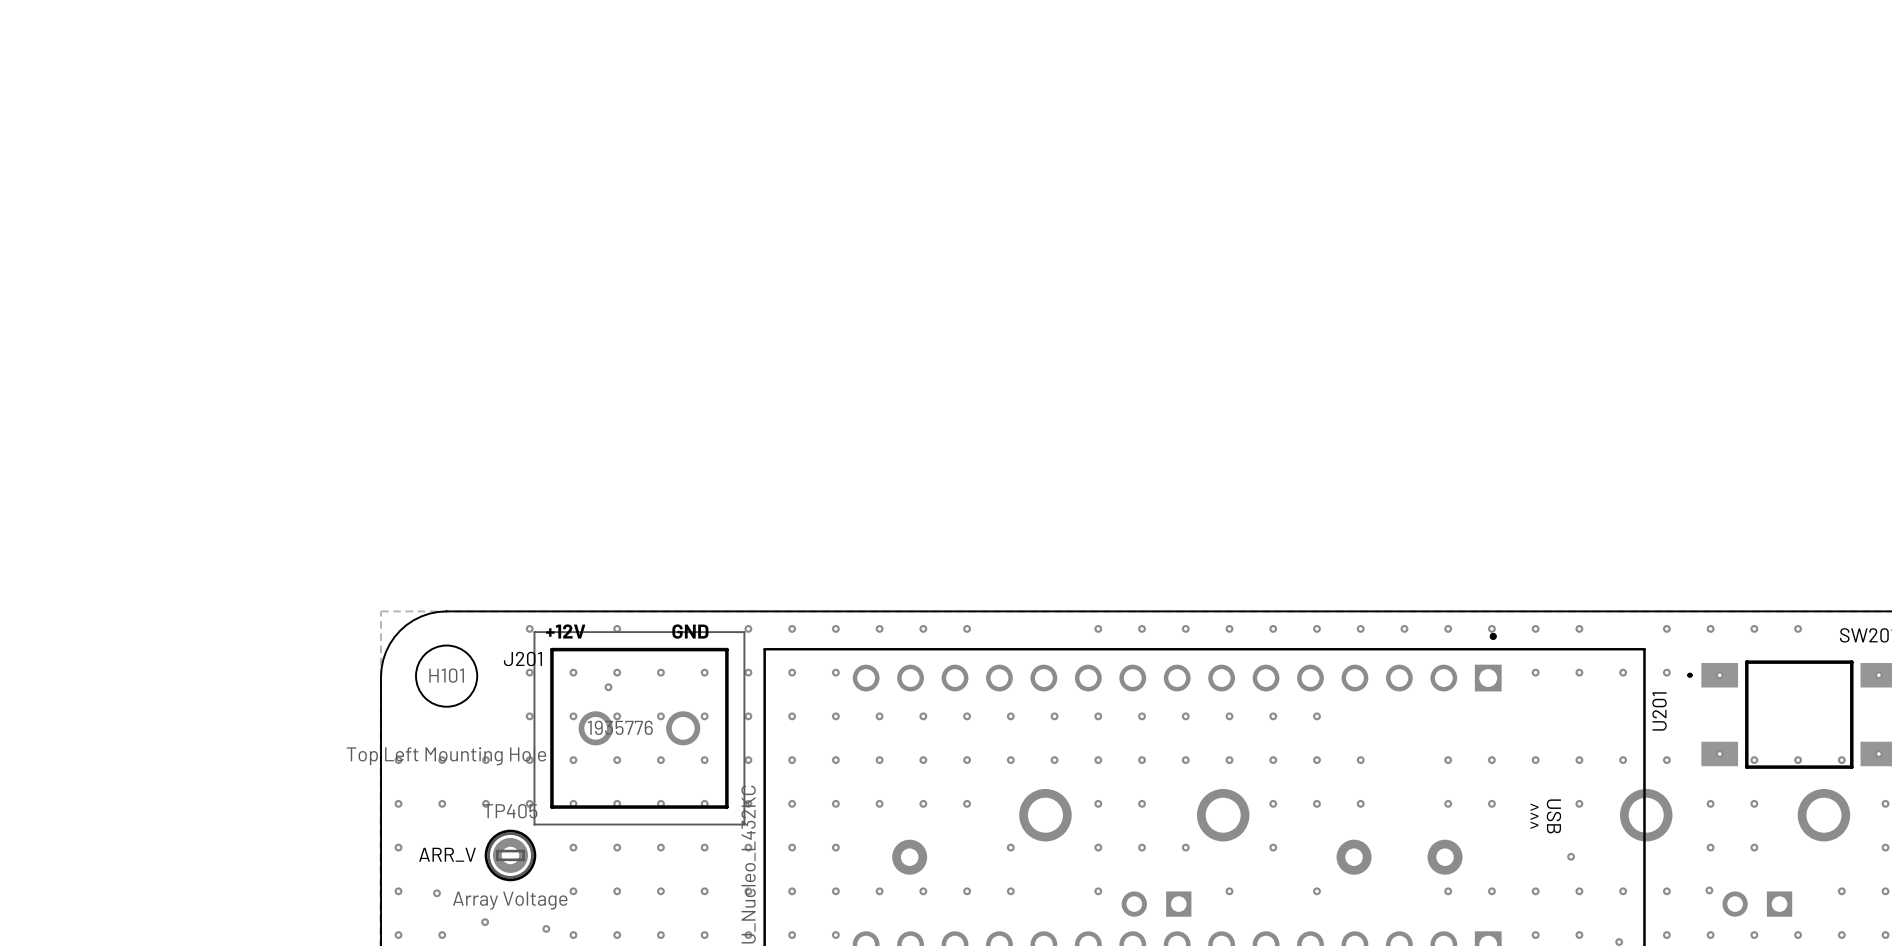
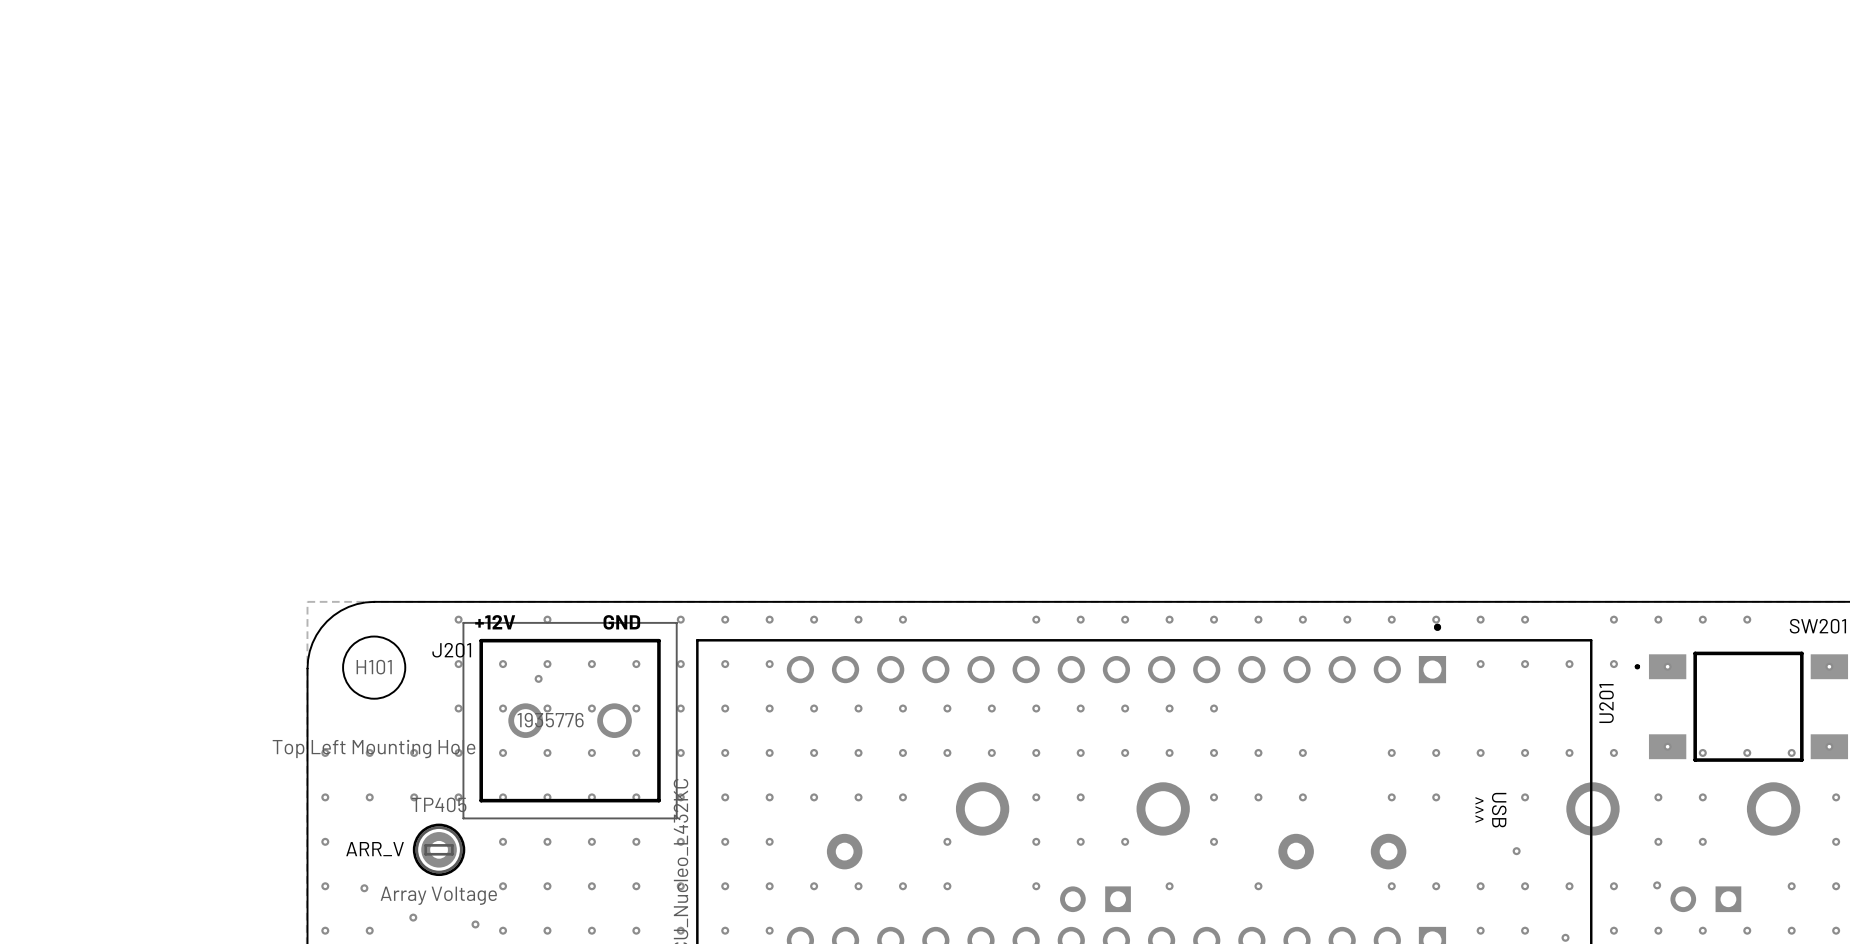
via: (1316, 716) -> none

